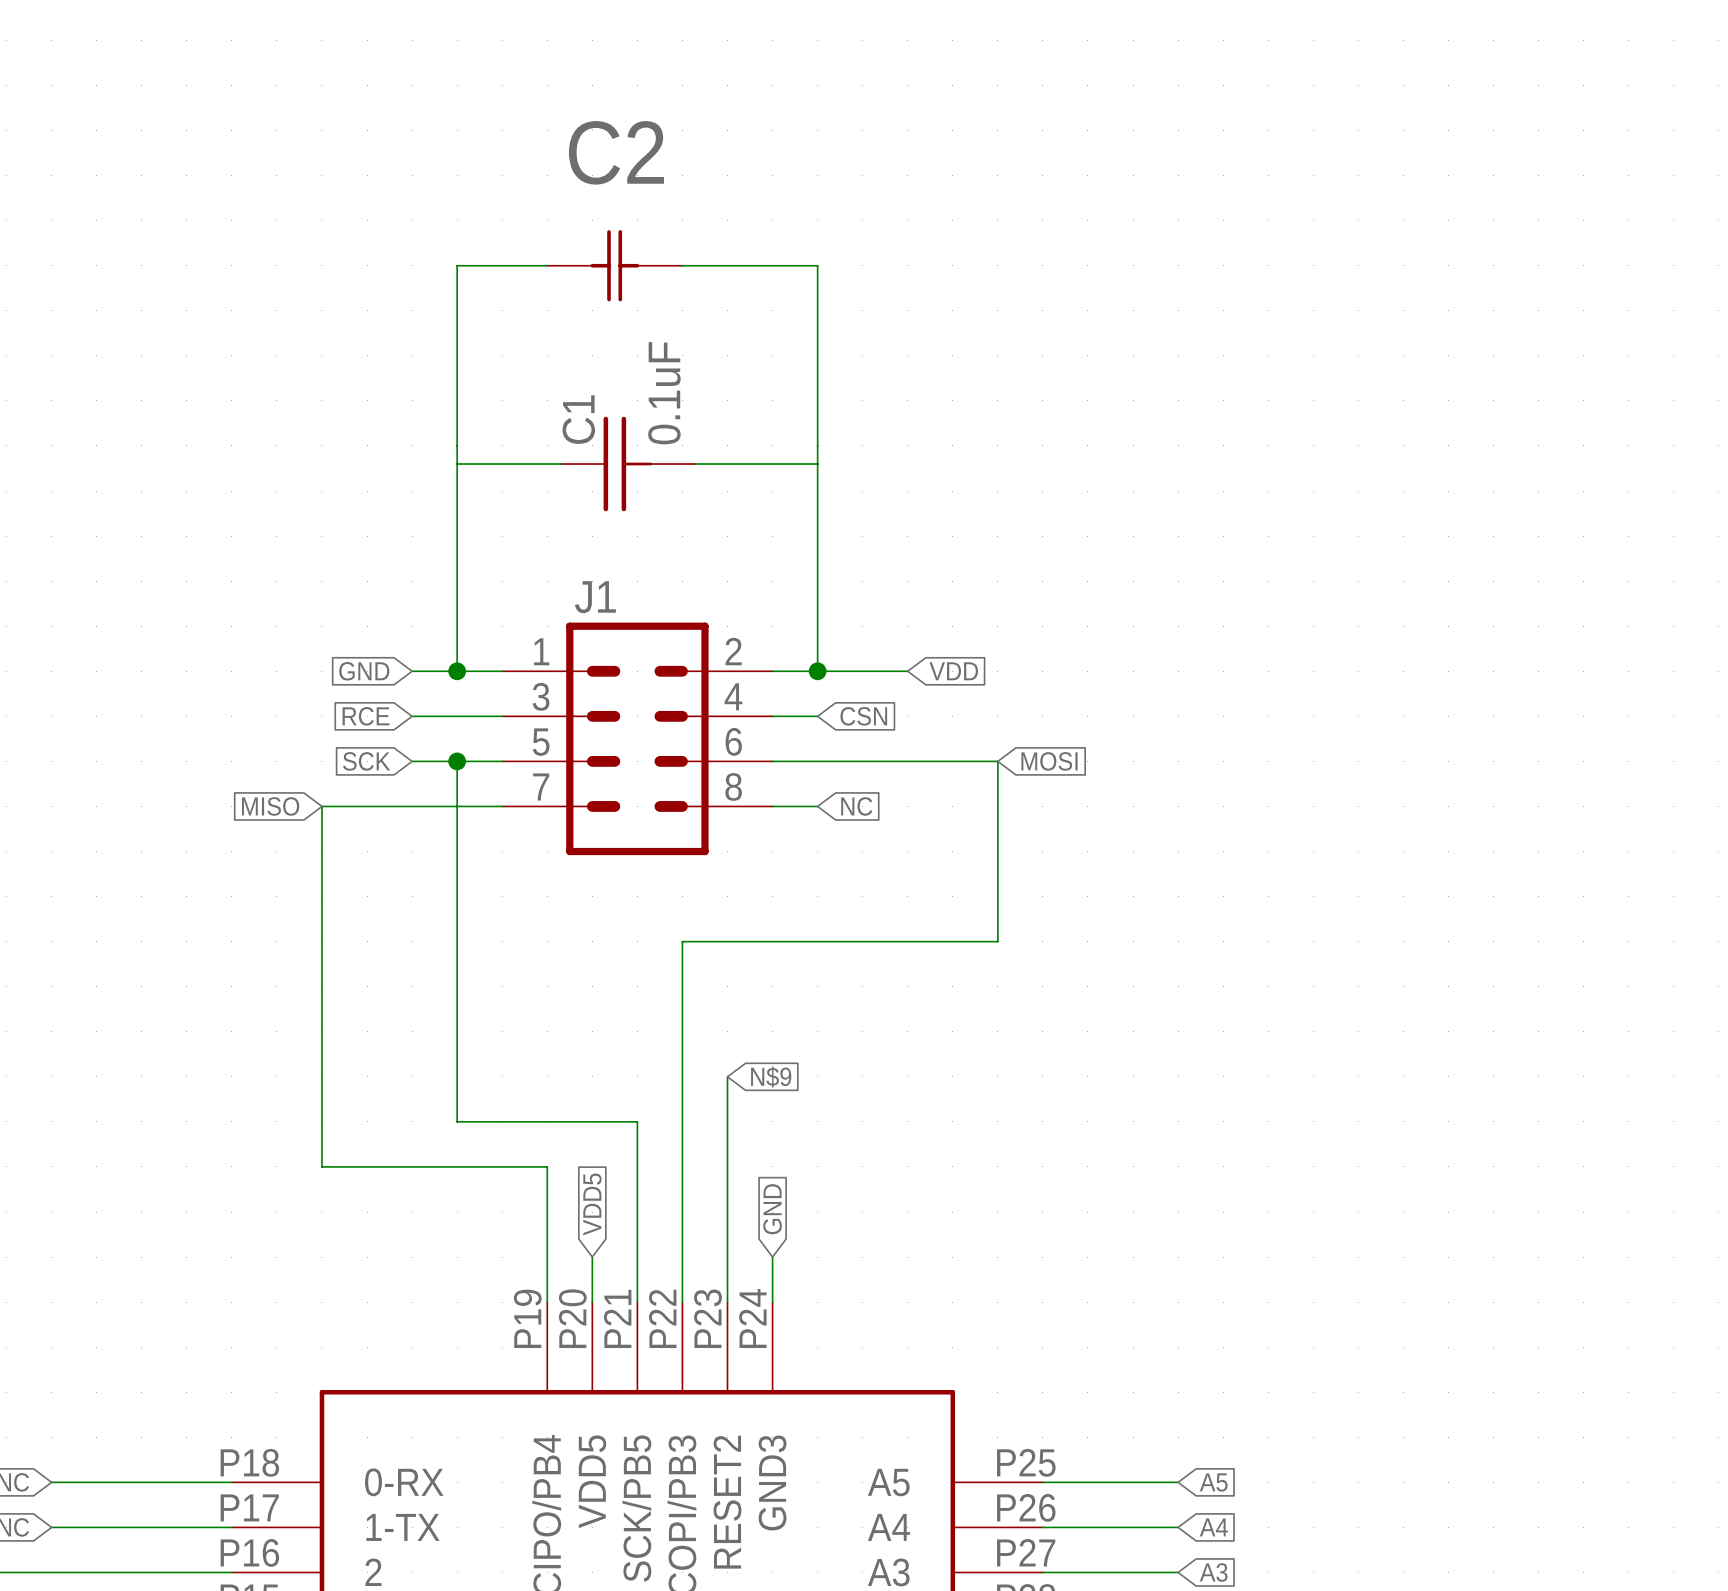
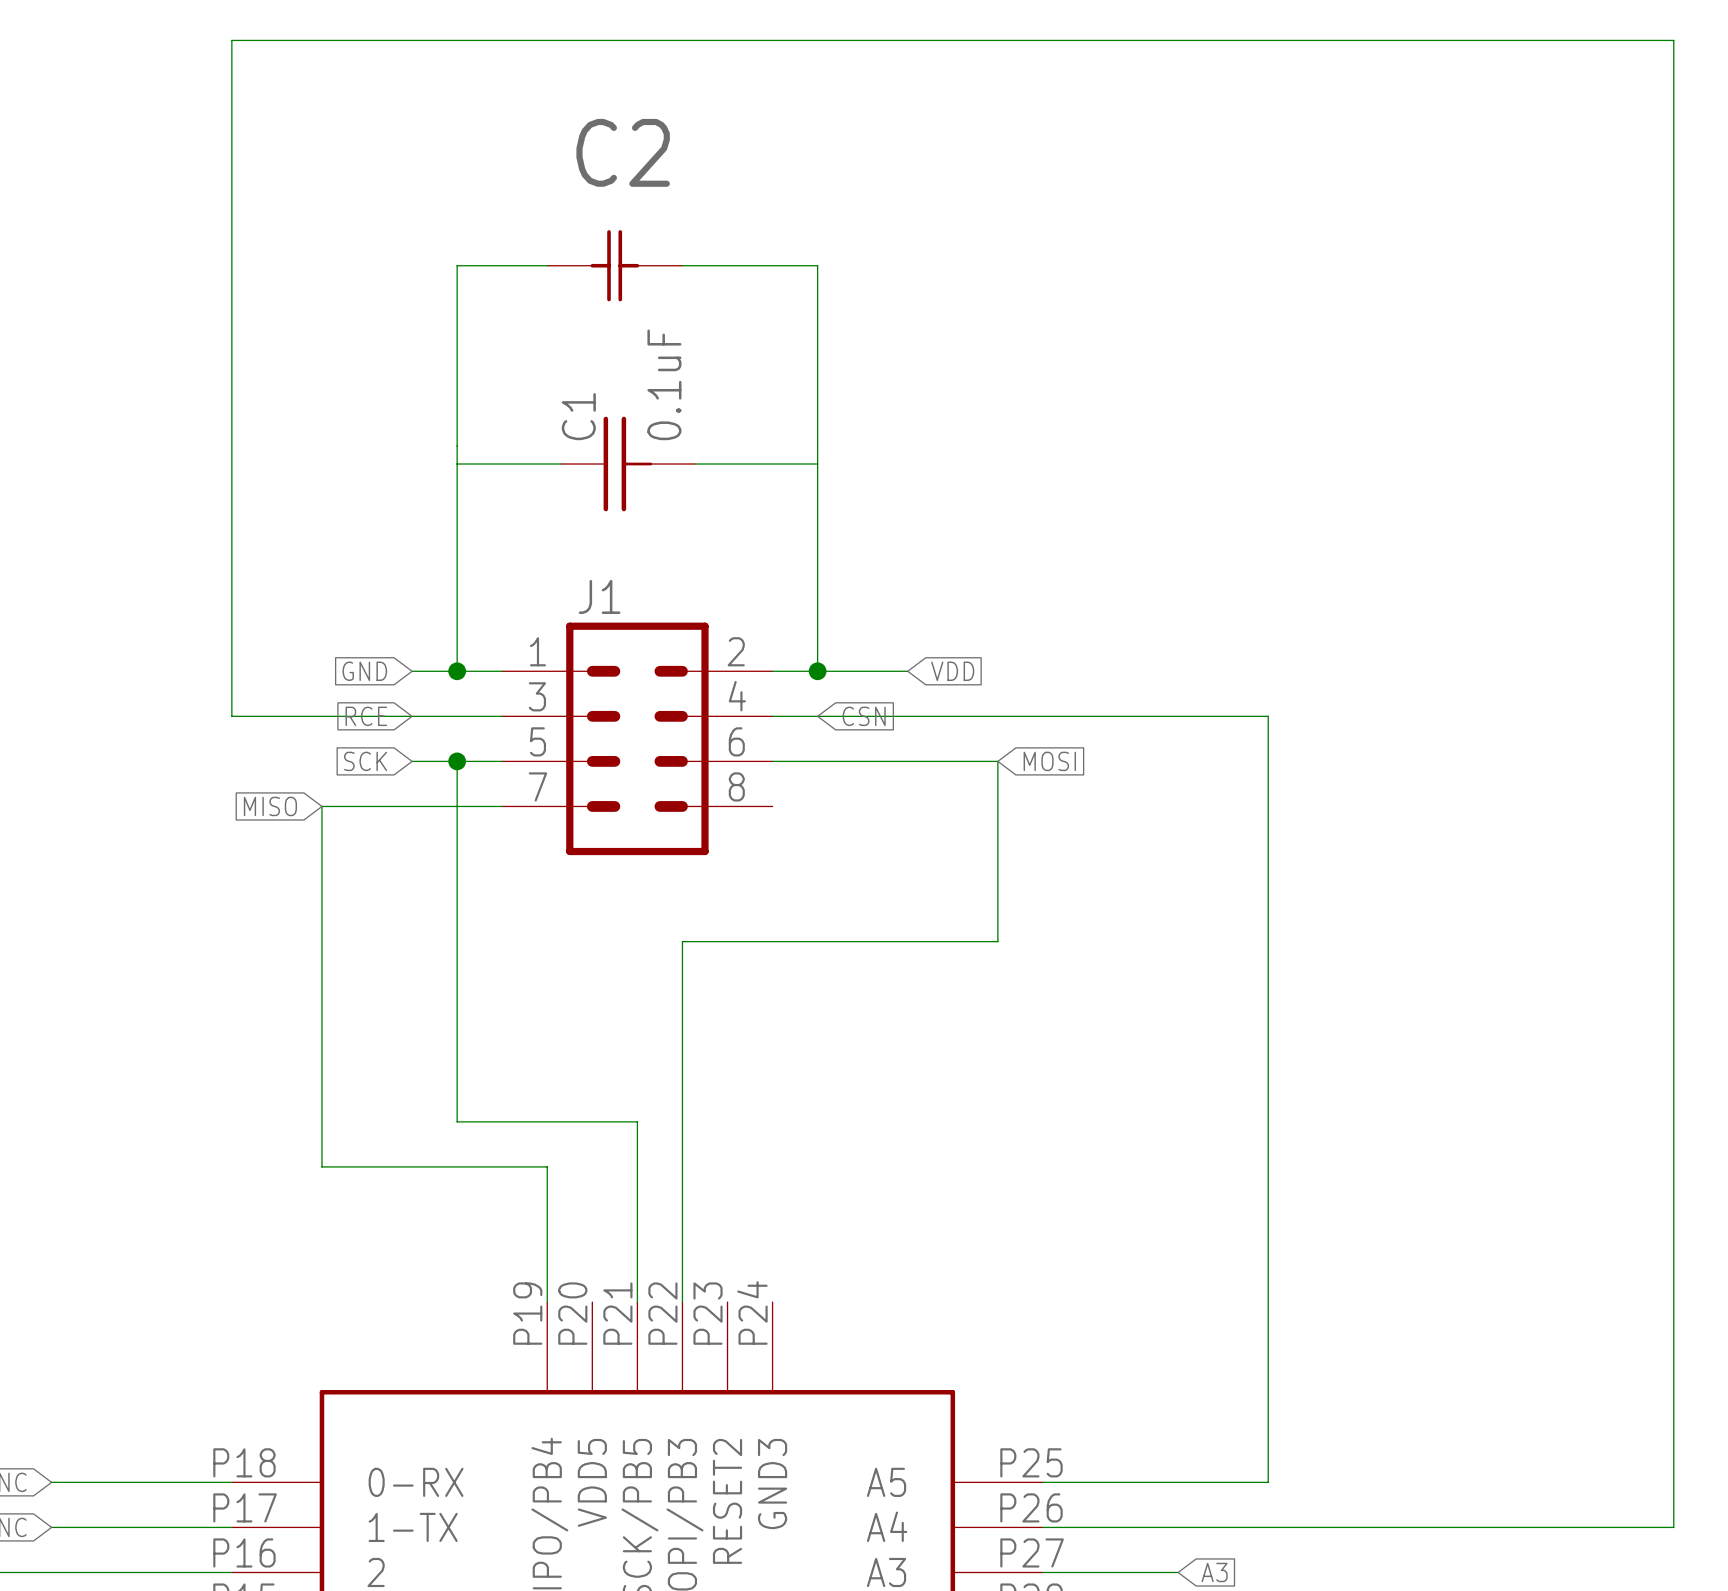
wire: none -> (412, 716) (231, 716) (231, 40) (1673, 40) (1673, 1527) (1178, 1527)
wire: none -> (817, 716) (1268, 716) (1268, 1482) (1178, 1482)
wire: (772, 806) (817, 806) -> none
global label: NC (856, 806) -> none
wire: (727, 1076) (727, 1302) -> none
global label: N$9 (771, 1077) -> none
global label: VDD5 (592, 1204) -> none
global label: GND (772, 1209) -> none
wire: (592, 1257) (592, 1302) -> none
wire: (772, 1257) (772, 1302) -> none
global label: A5 (1213, 1482) -> none
global label: A4 (1213, 1527) -> none

